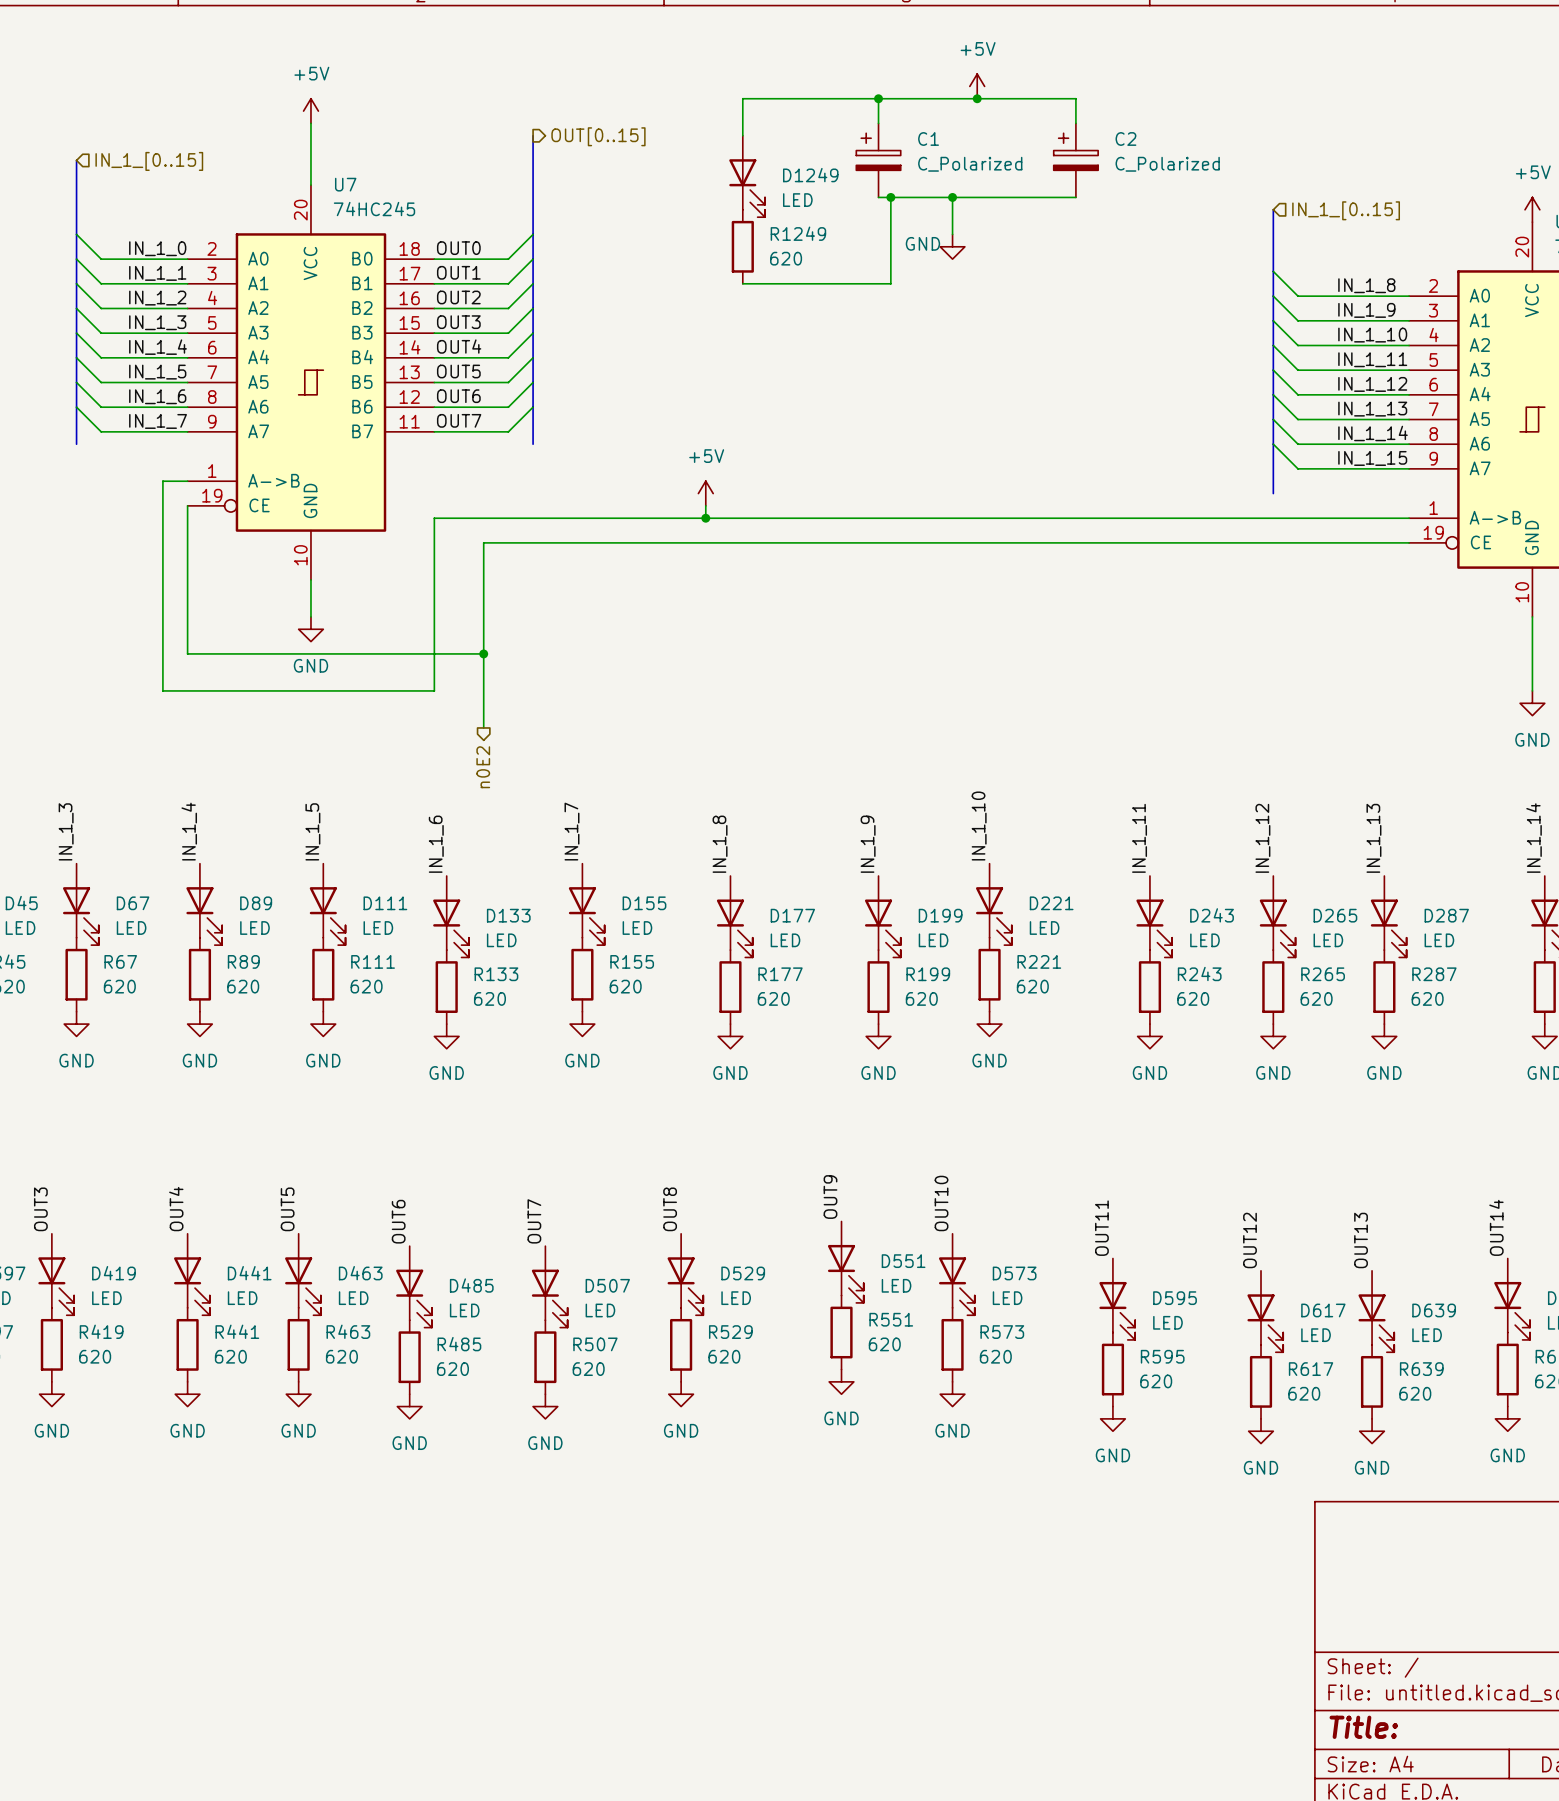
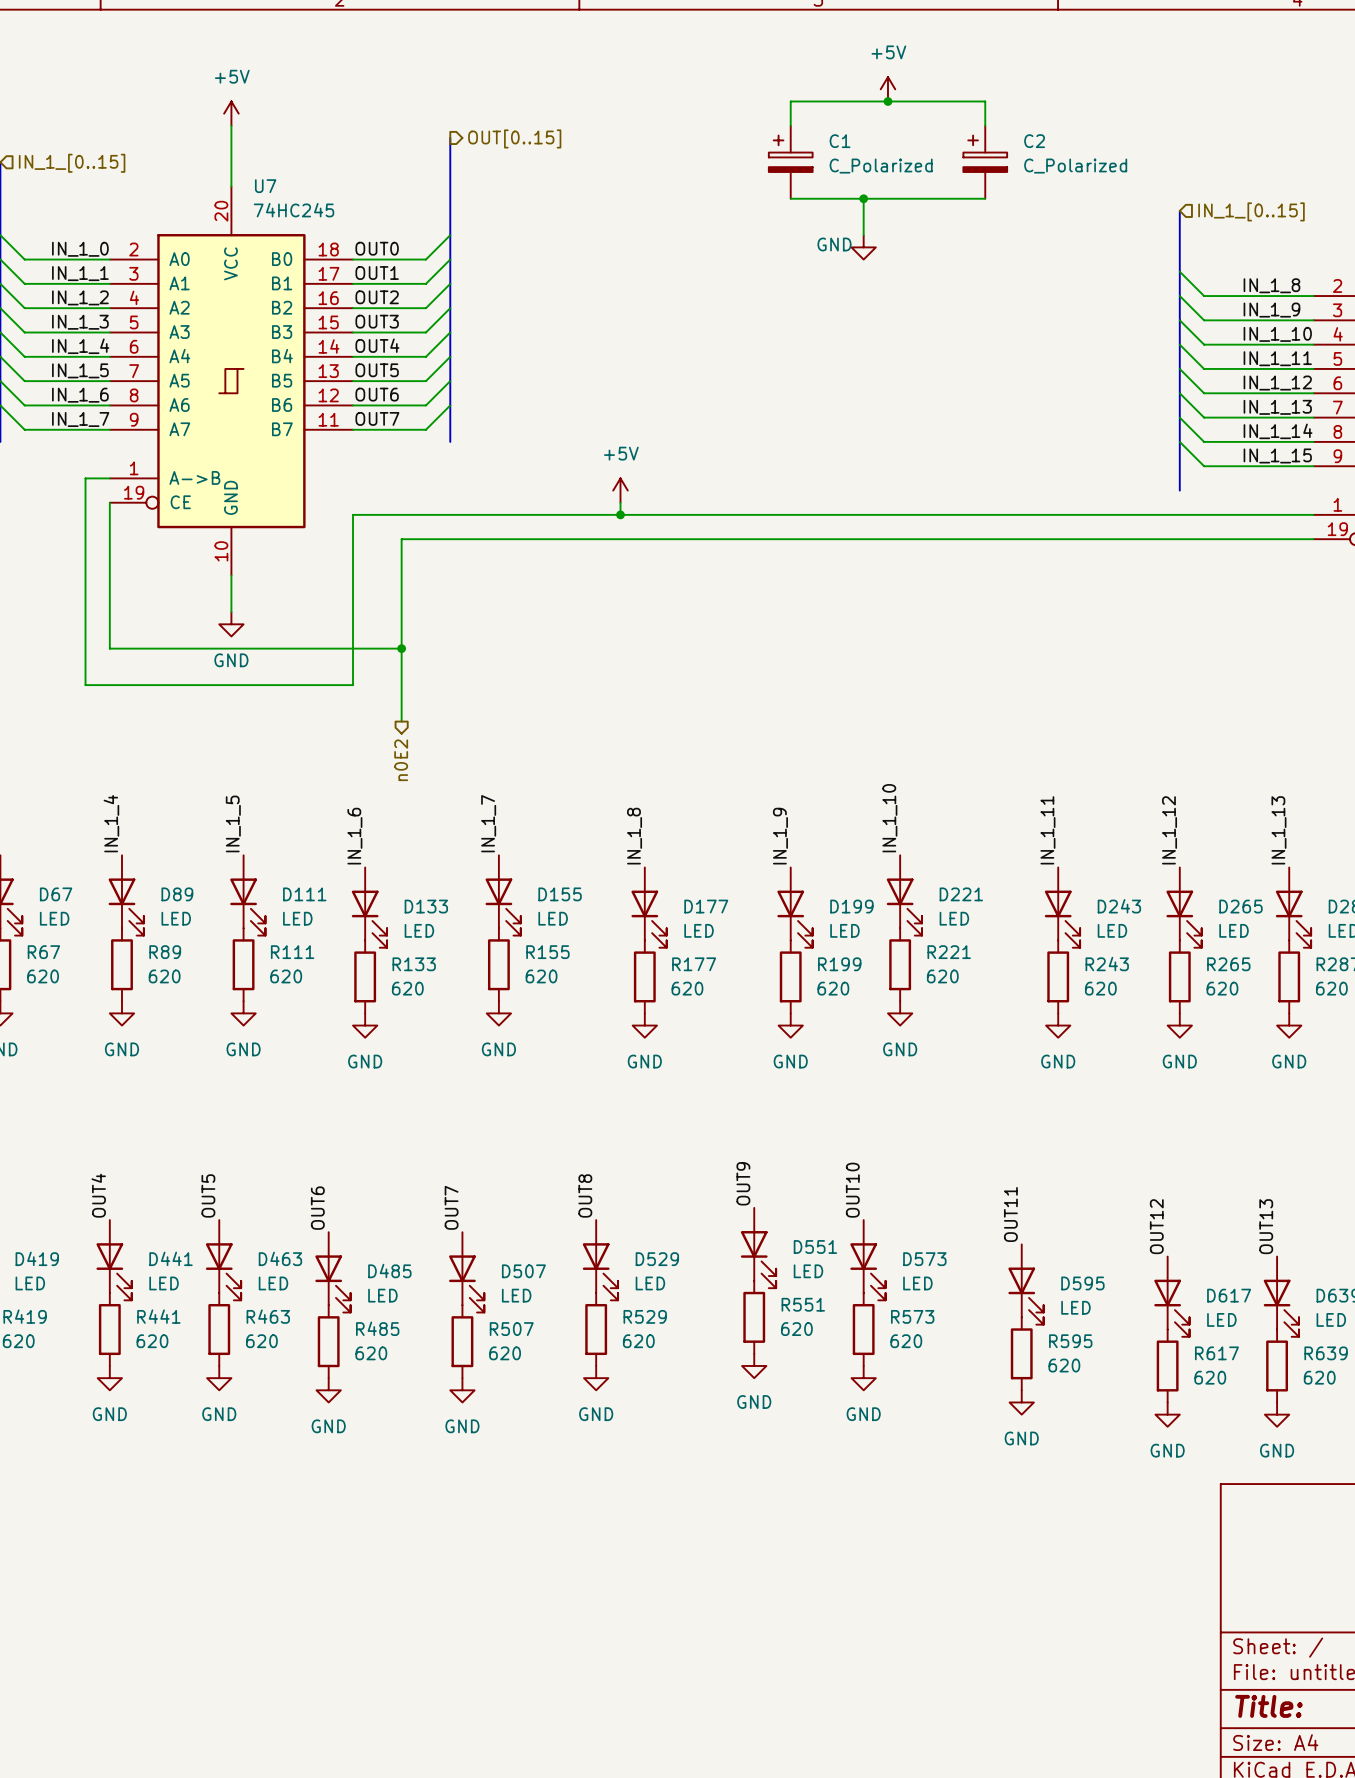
wire: (878, 98) (742, 98) (742, 135) -> none
junction: (878, 98) -> none
D1249: LED (747, 176) -> none
wire: (890, 197) (890, 283) (742, 283) -> none
junction: (890, 197) -> none
R1249: 620 (742, 246) -> none

